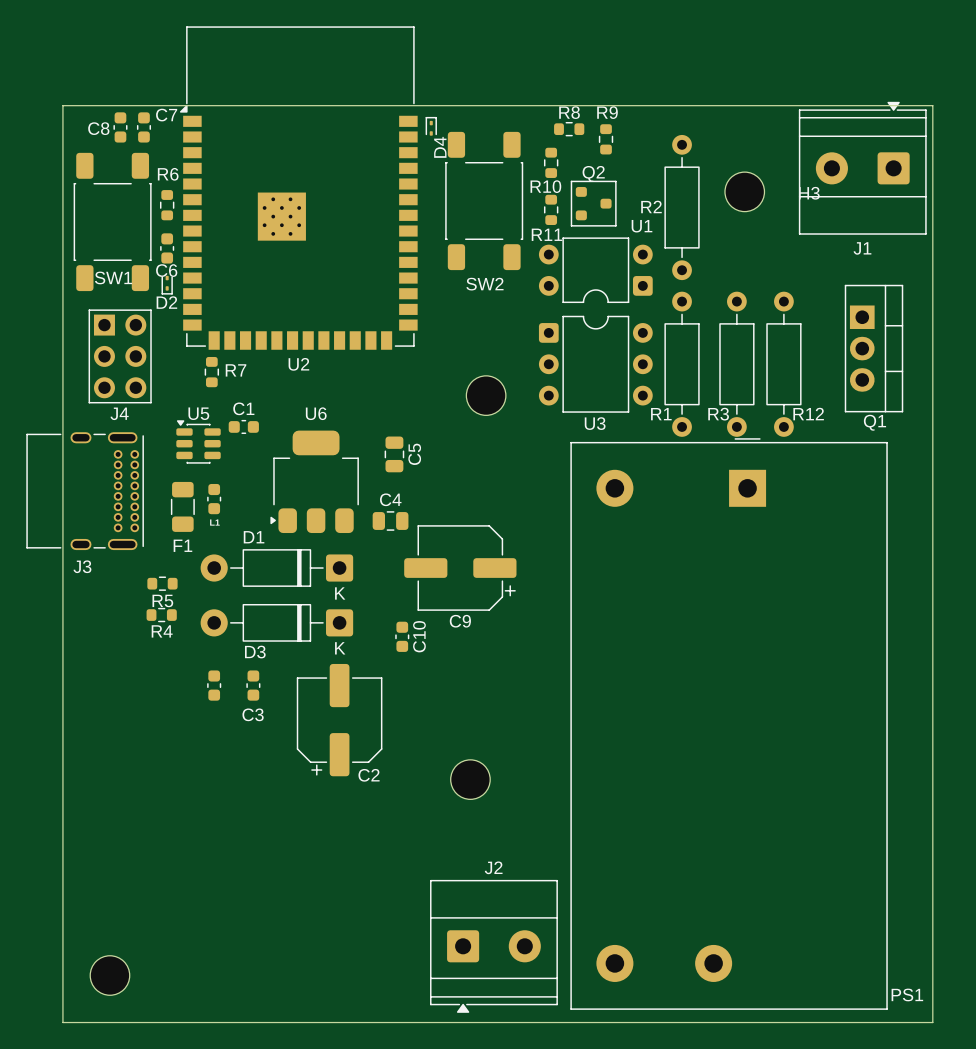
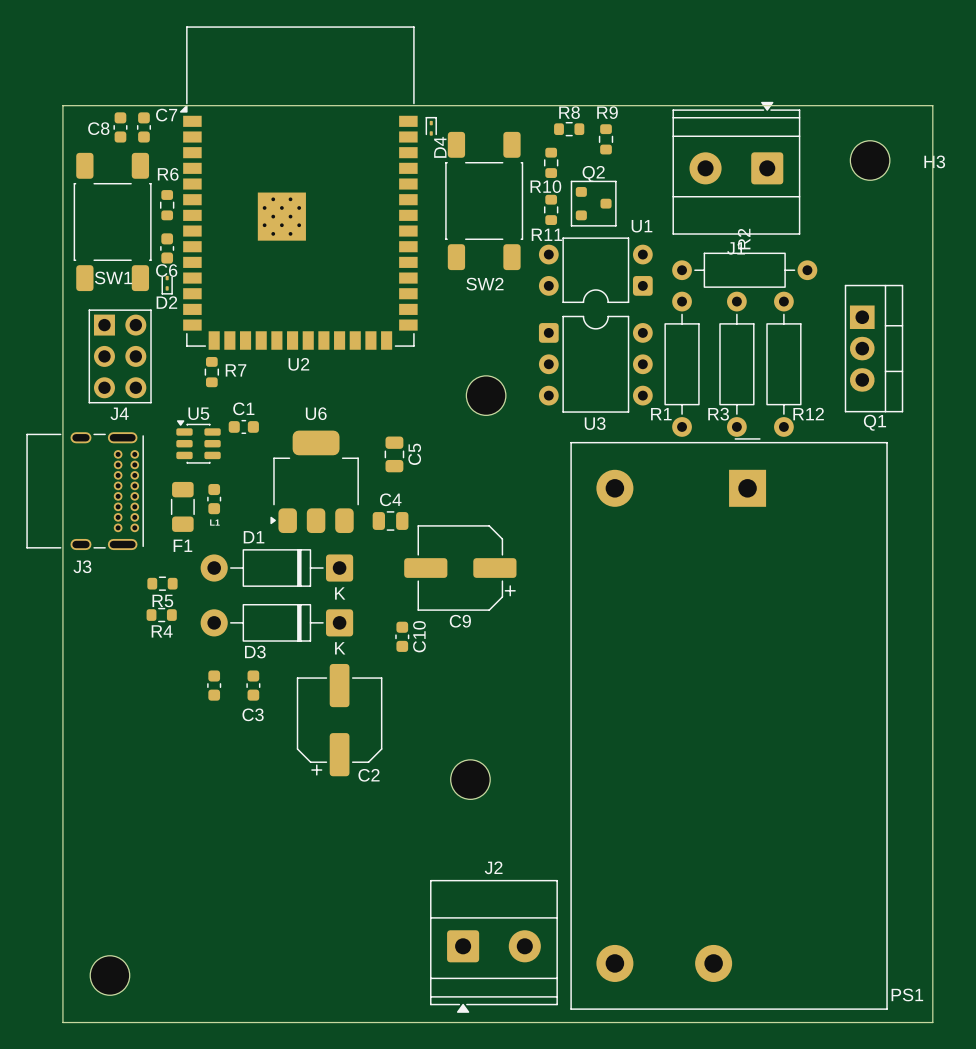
J1 position: (862, 168) -> (736, 168)
H3 position: (744, 191) -> (870, 160)
R2 rotation: 0° (682, 207) -> 90° clockwise (744, 270)
R2 position: (682, 207) -> (744, 270)

